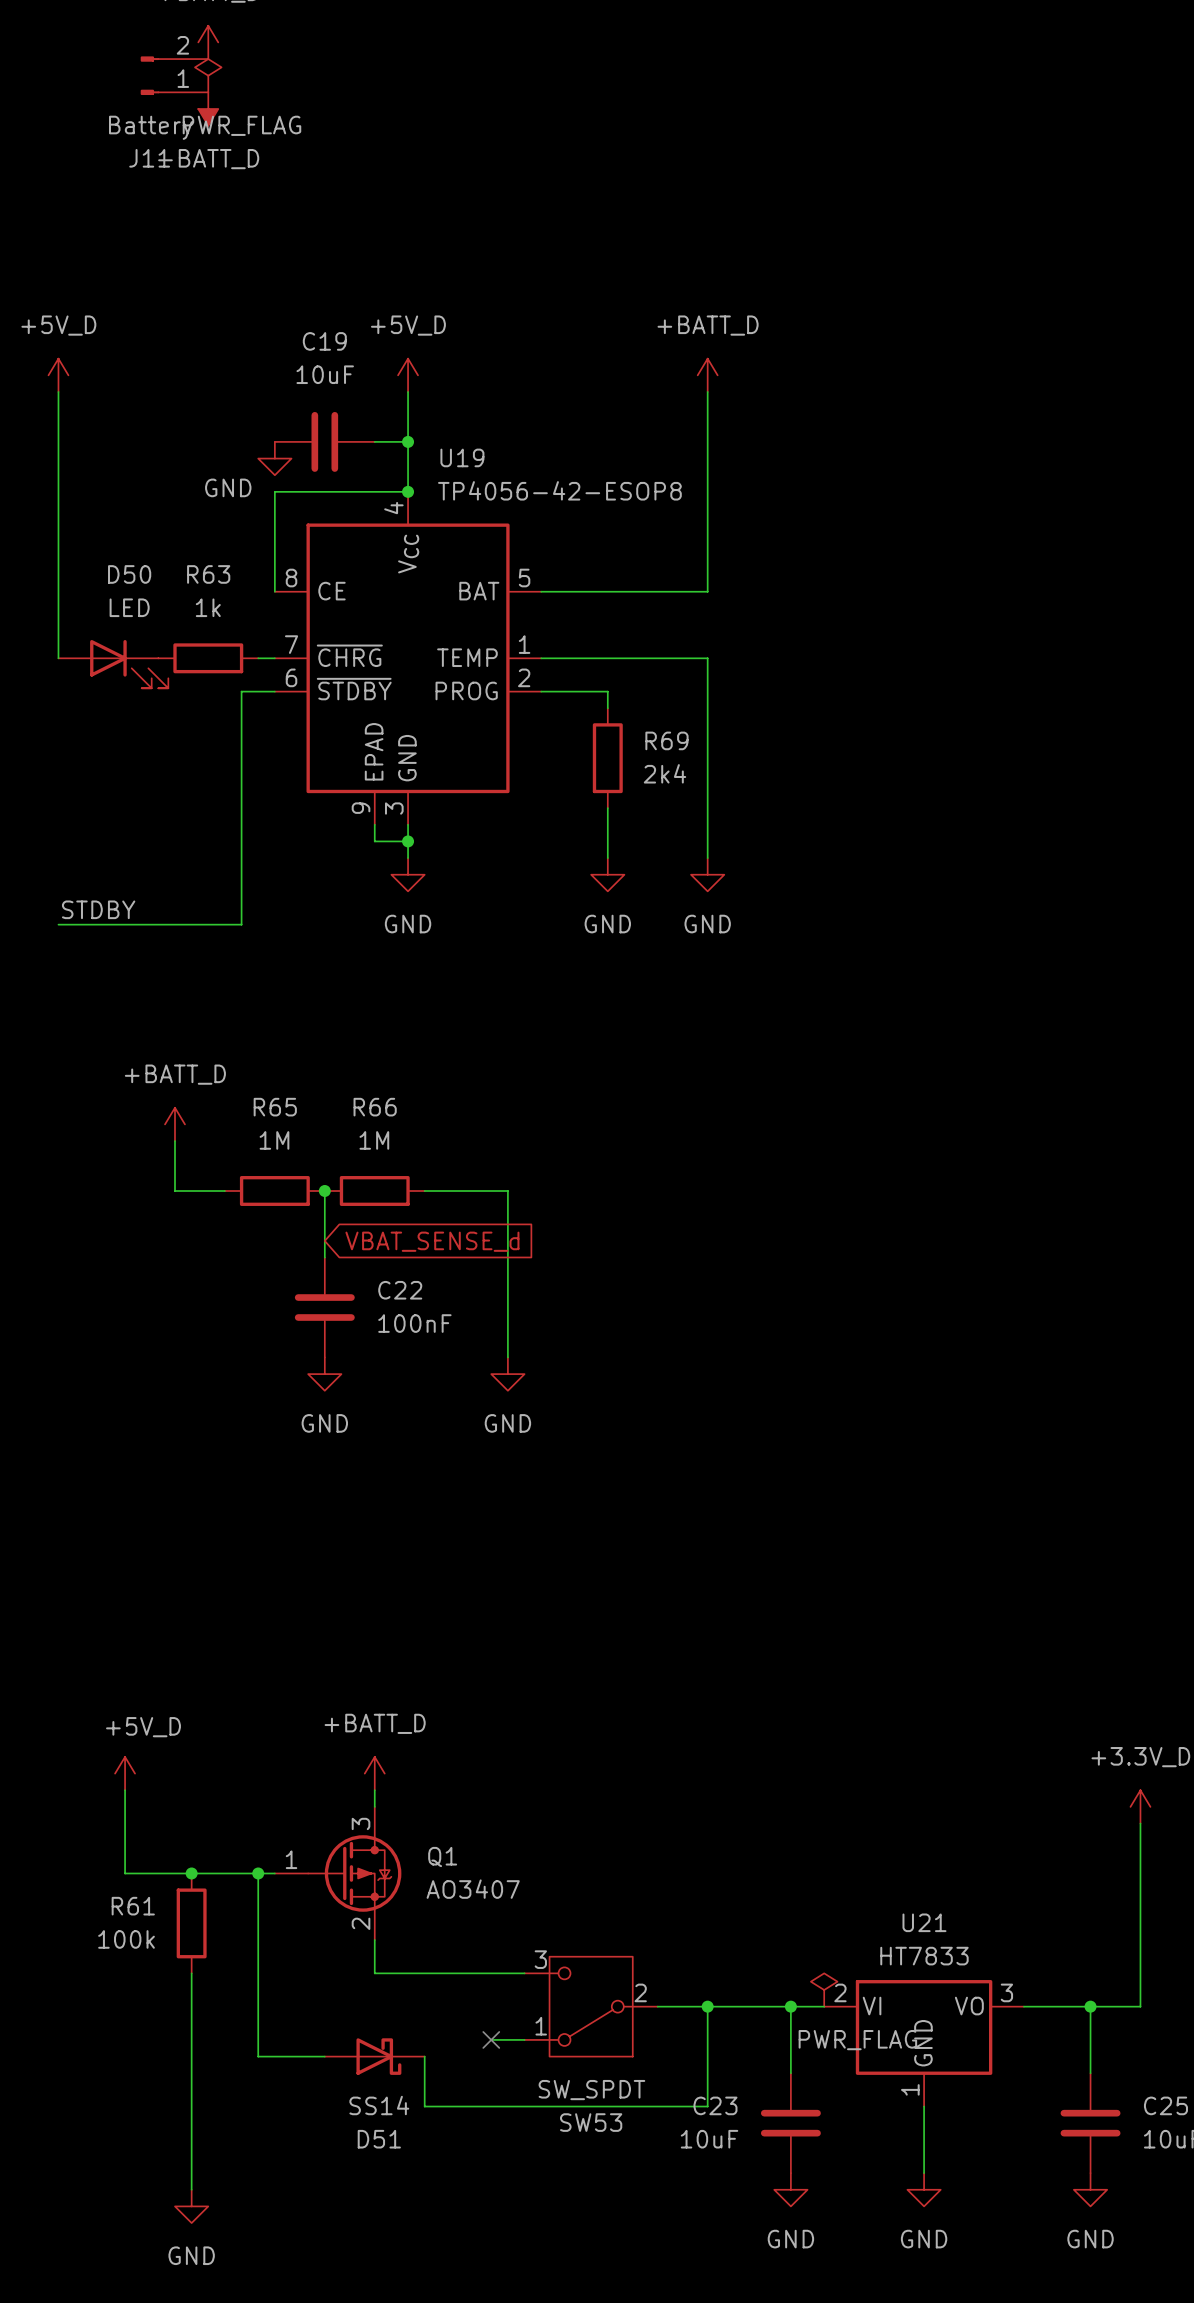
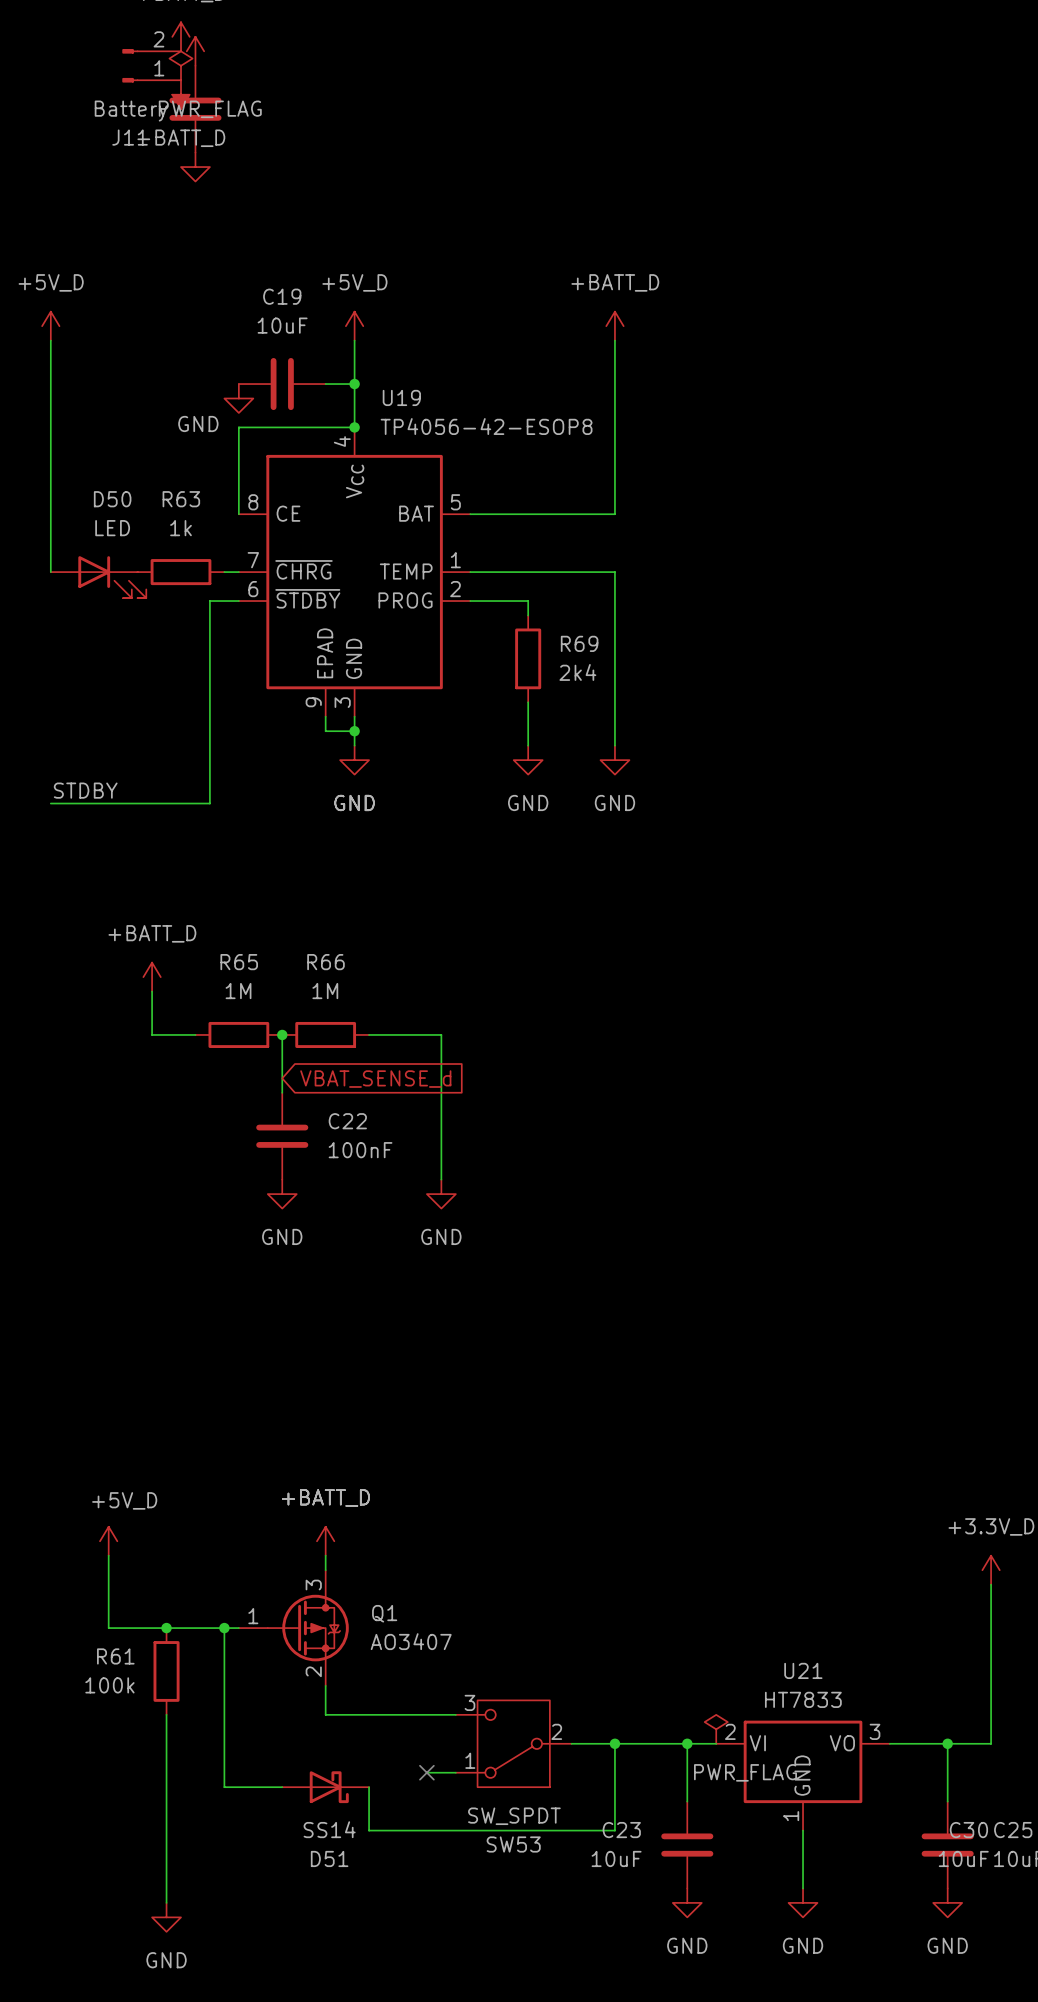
power symbol: none -> +BATT_D (195, 51)
C30: none -> 10uF (195, 109)
power symbol: none -> GND (195, 167)

